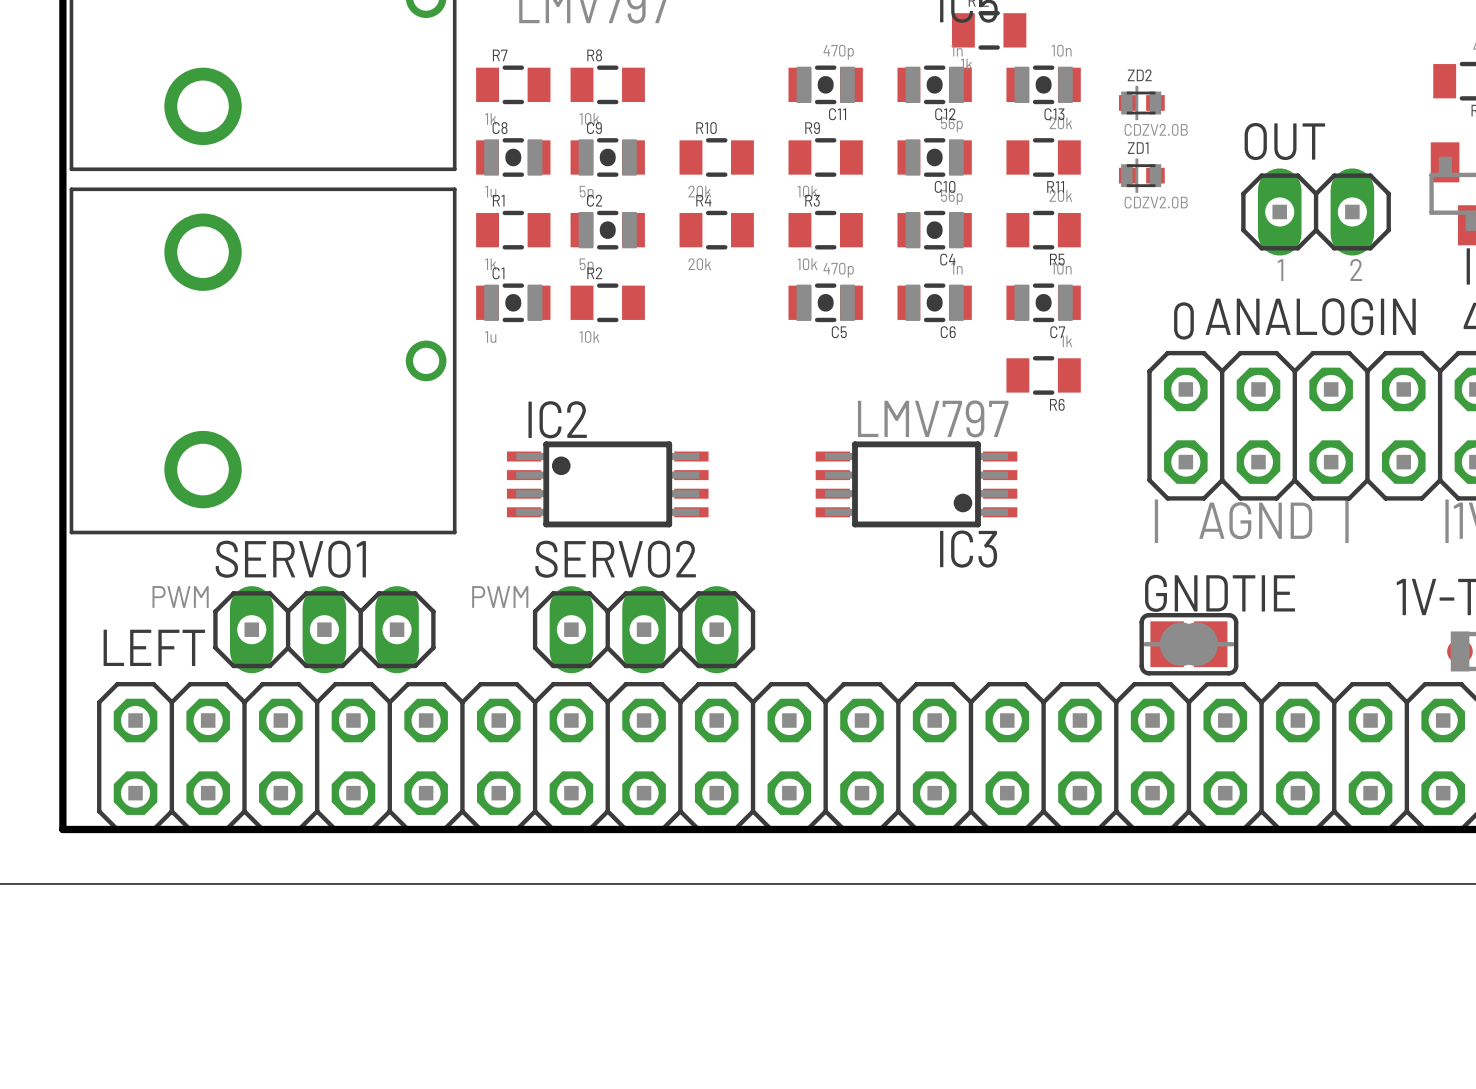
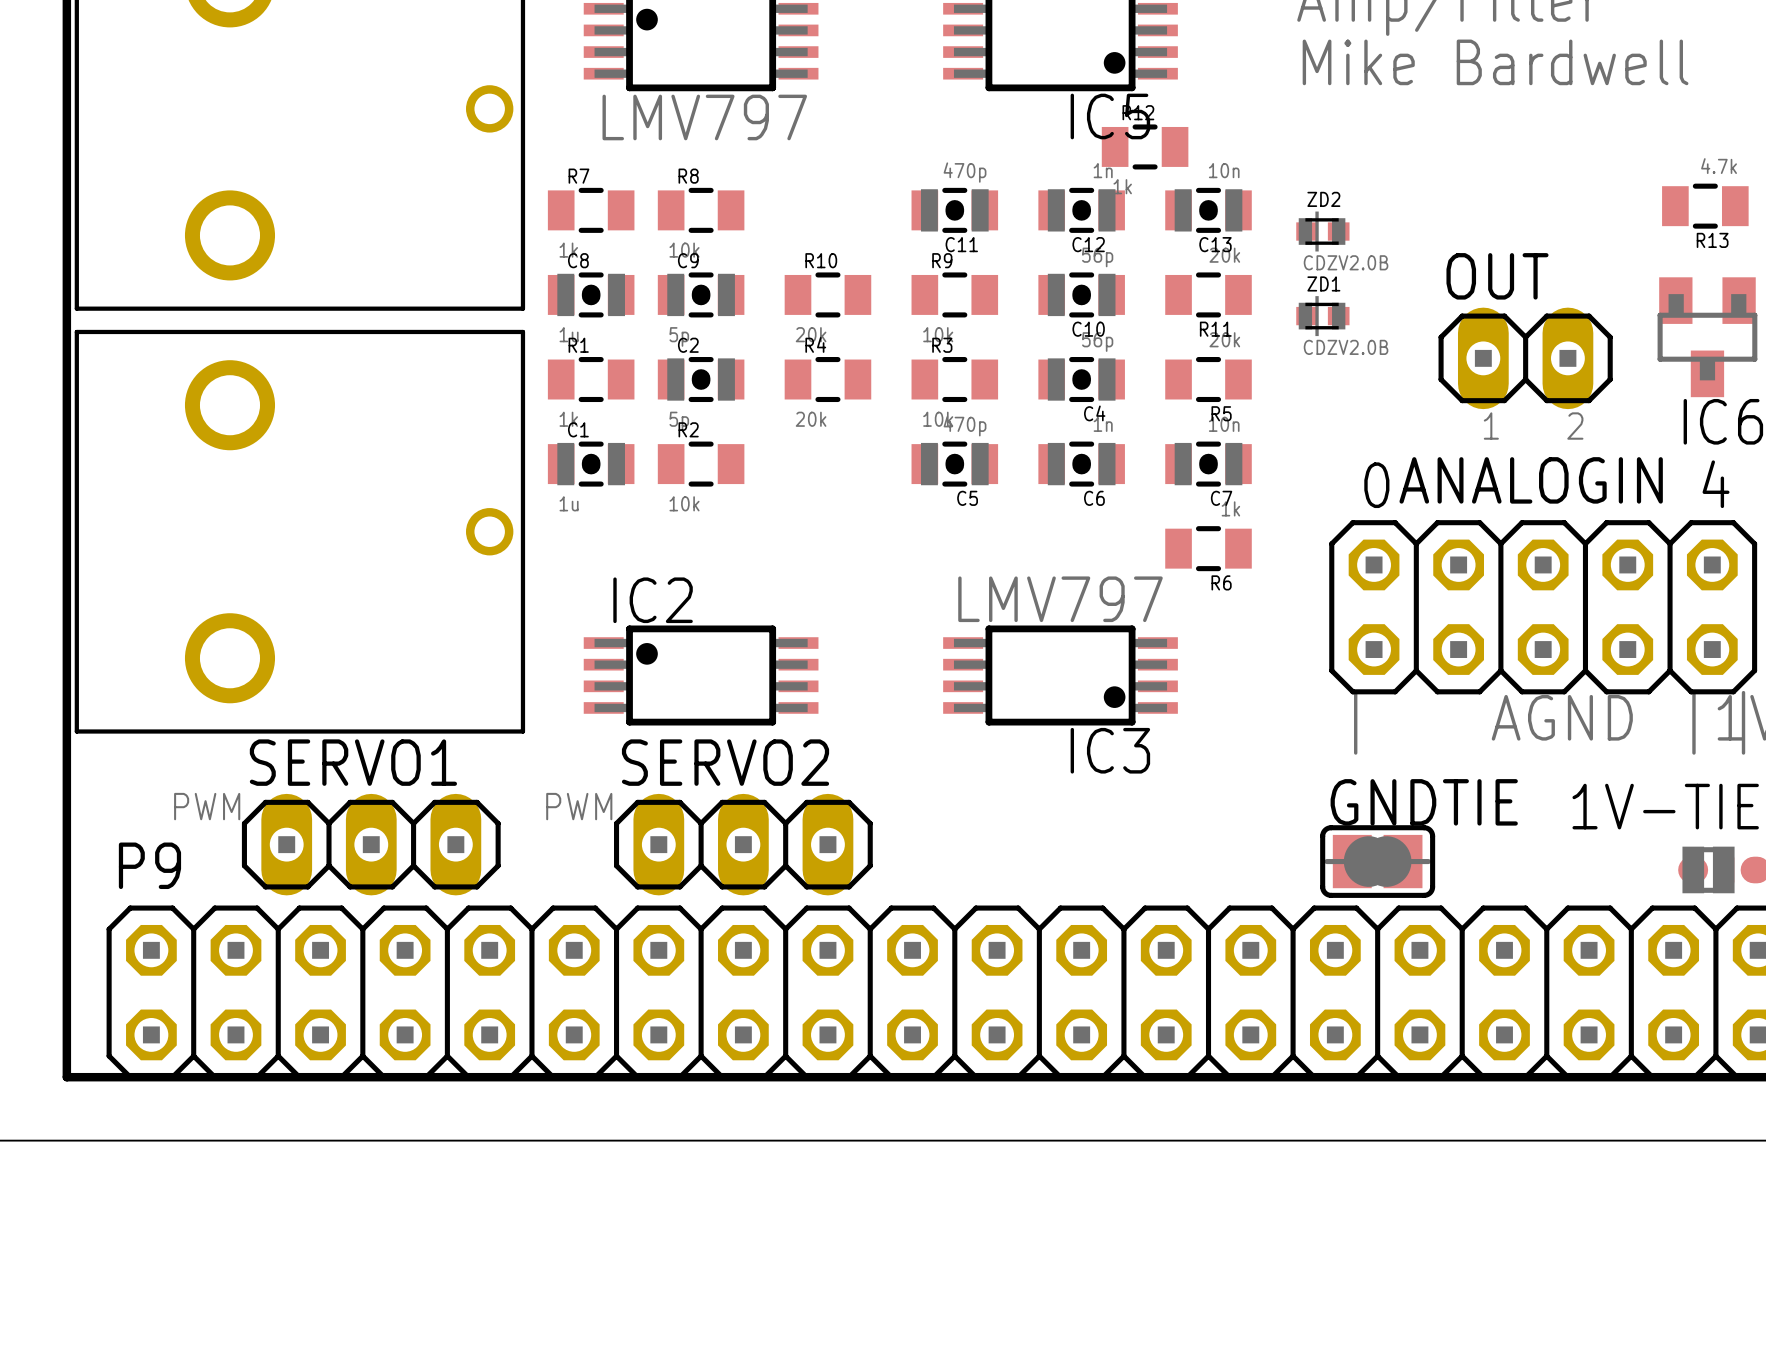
LEFT name: LEFT (154, 647) -> P9 (149, 865)

